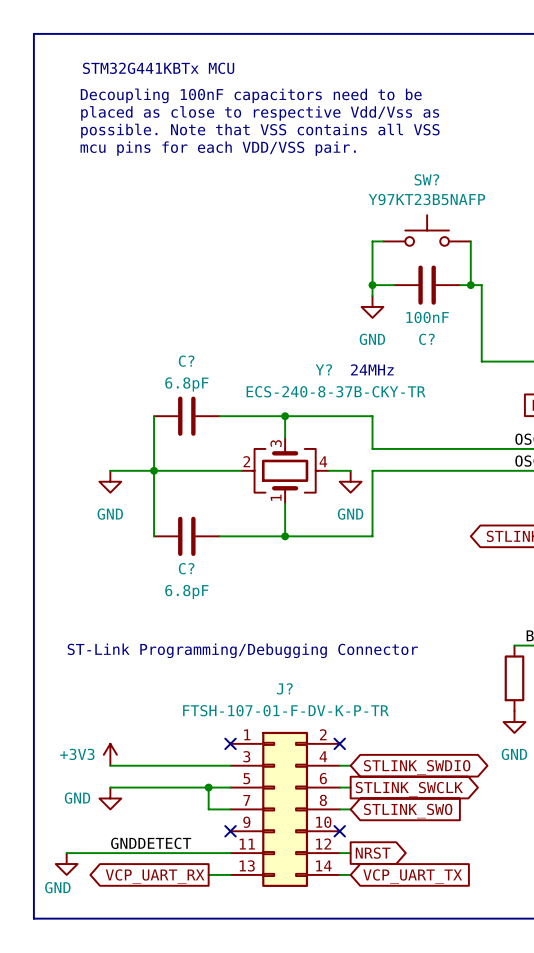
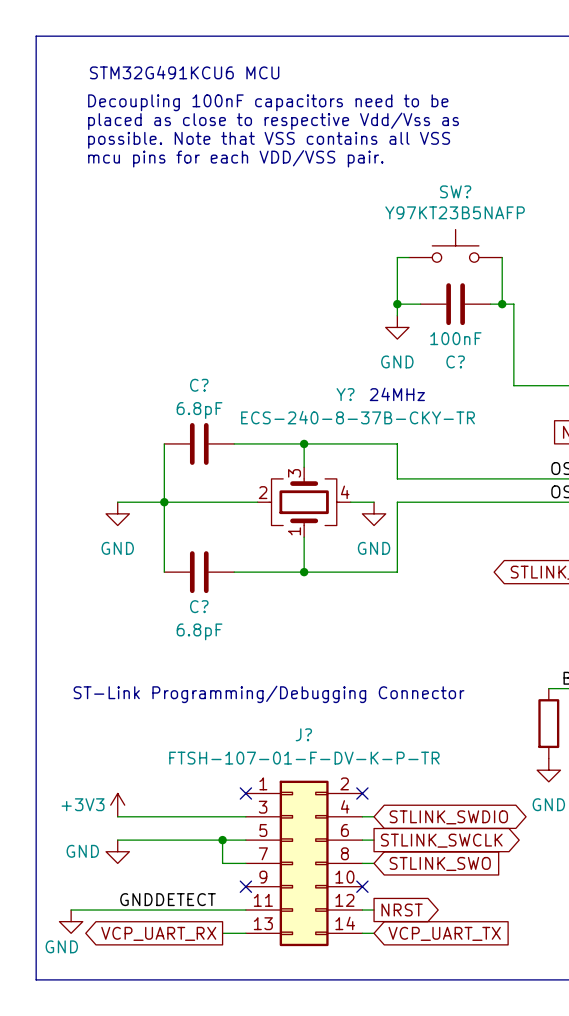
text: STM32G441KBTx MCU (158, 68) -> STM32G491KCU6 MCU (184, 72)

